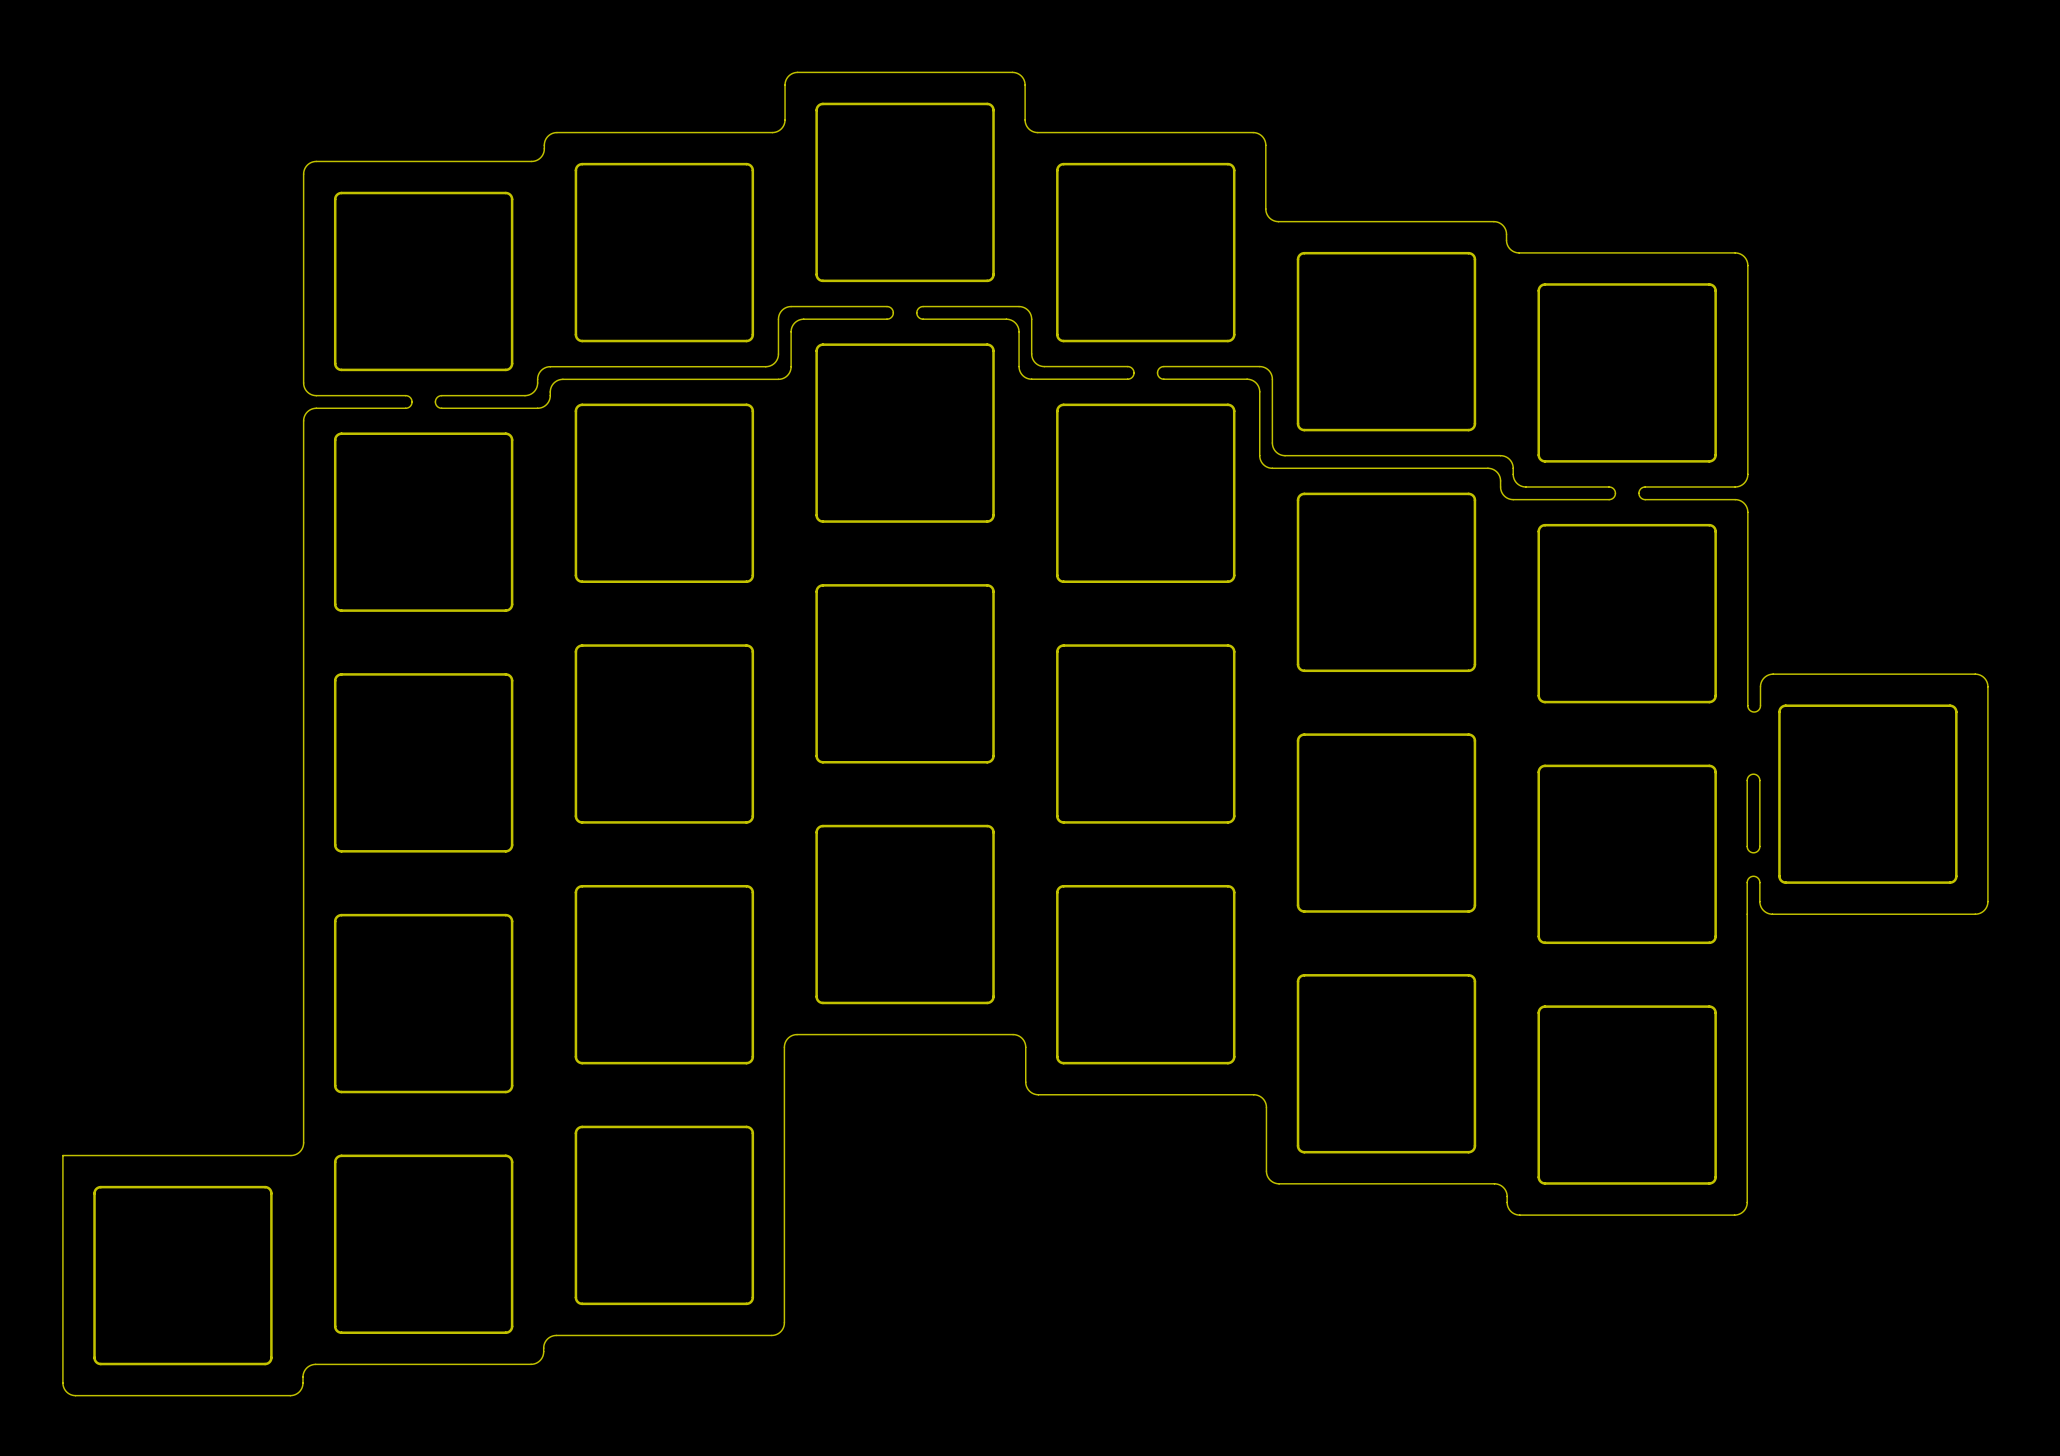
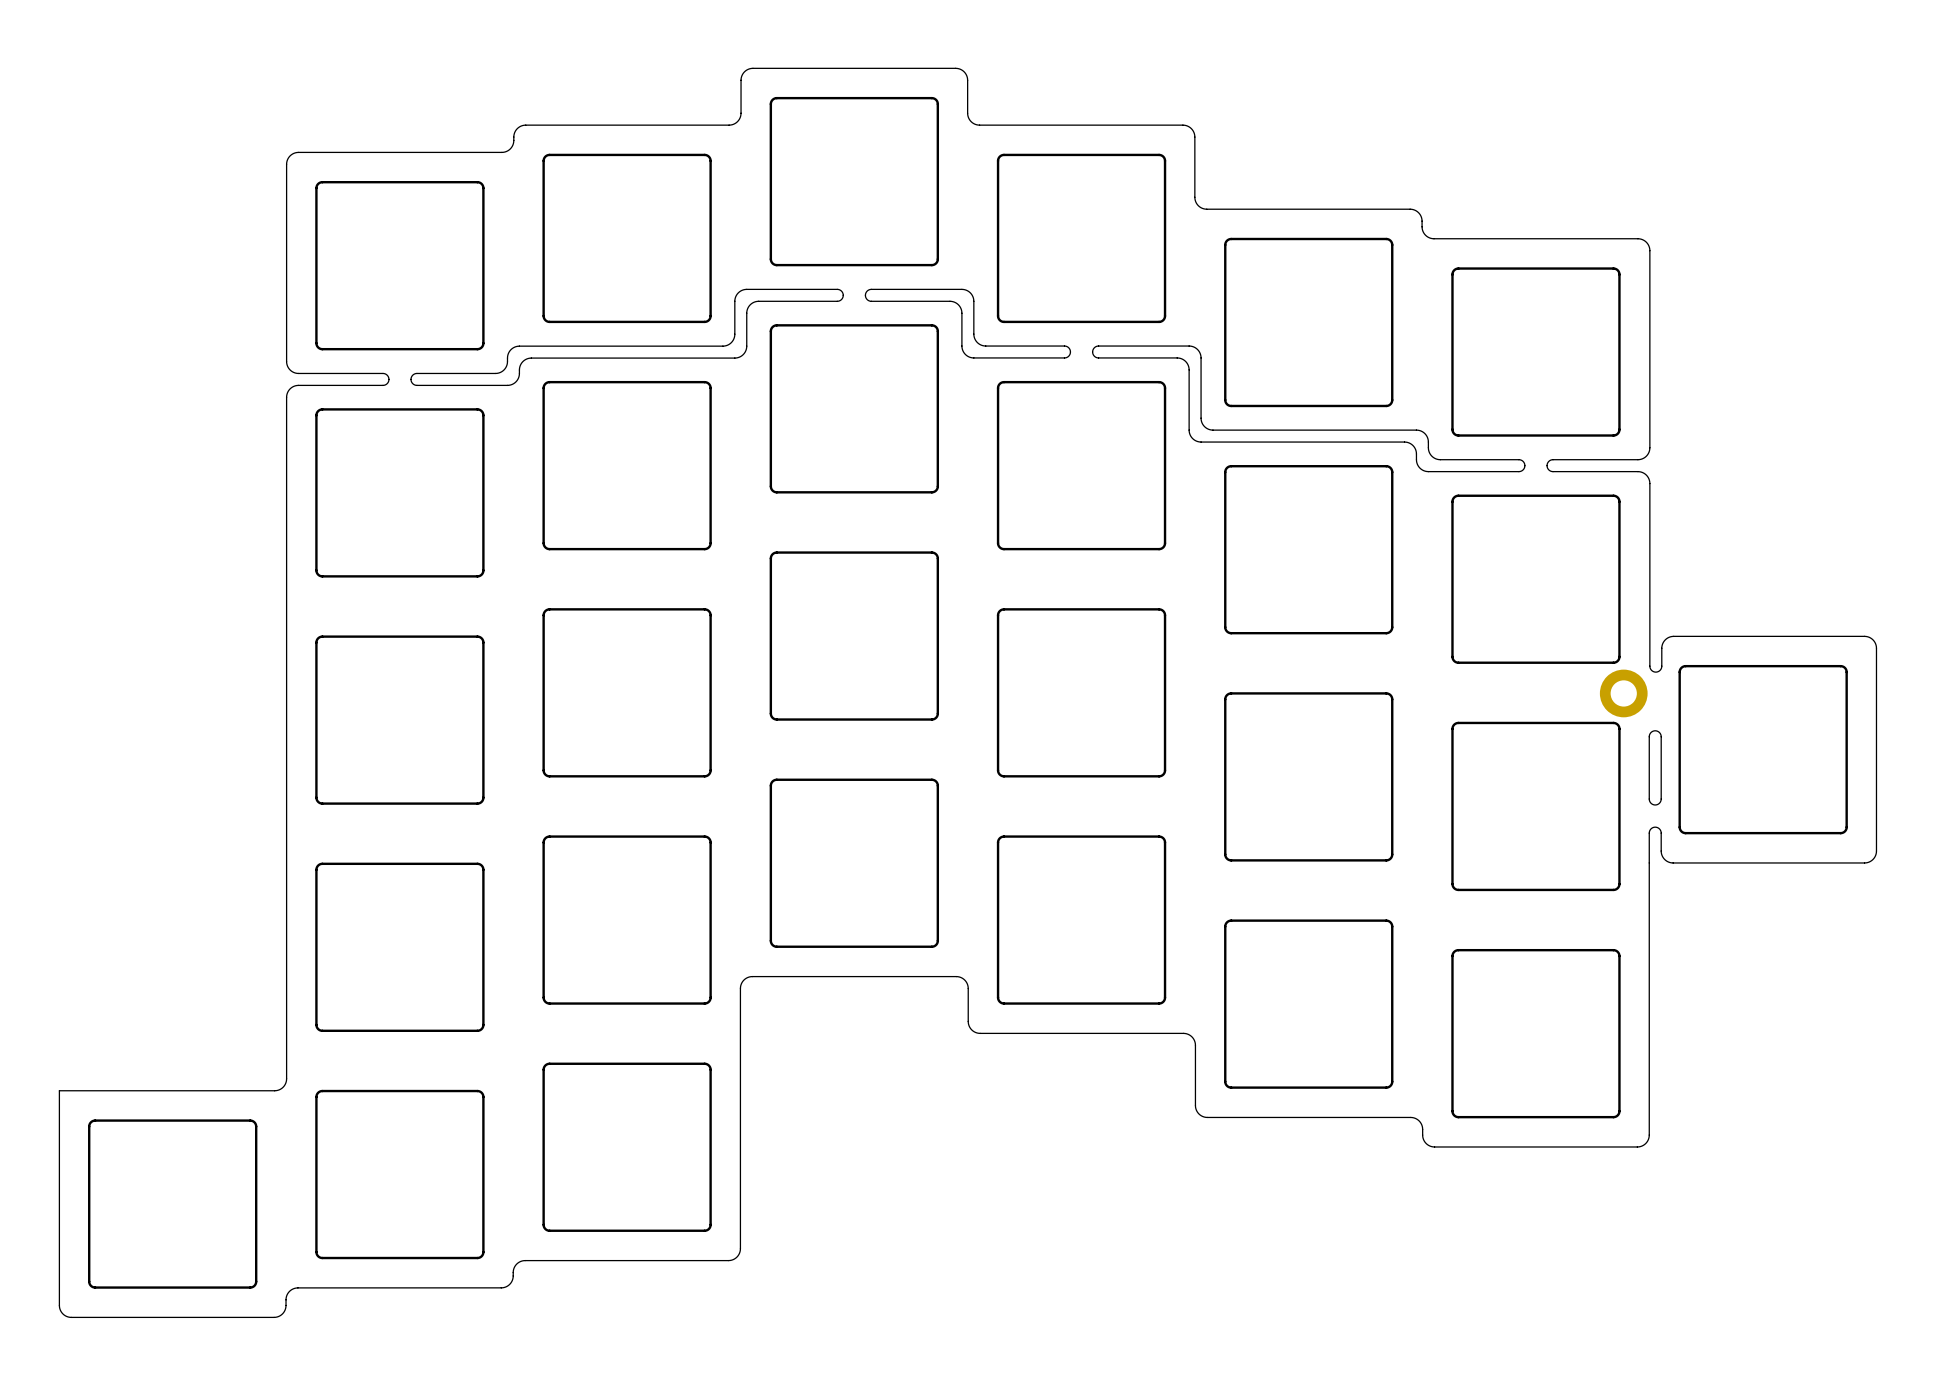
part: none -> (1623, 693)

